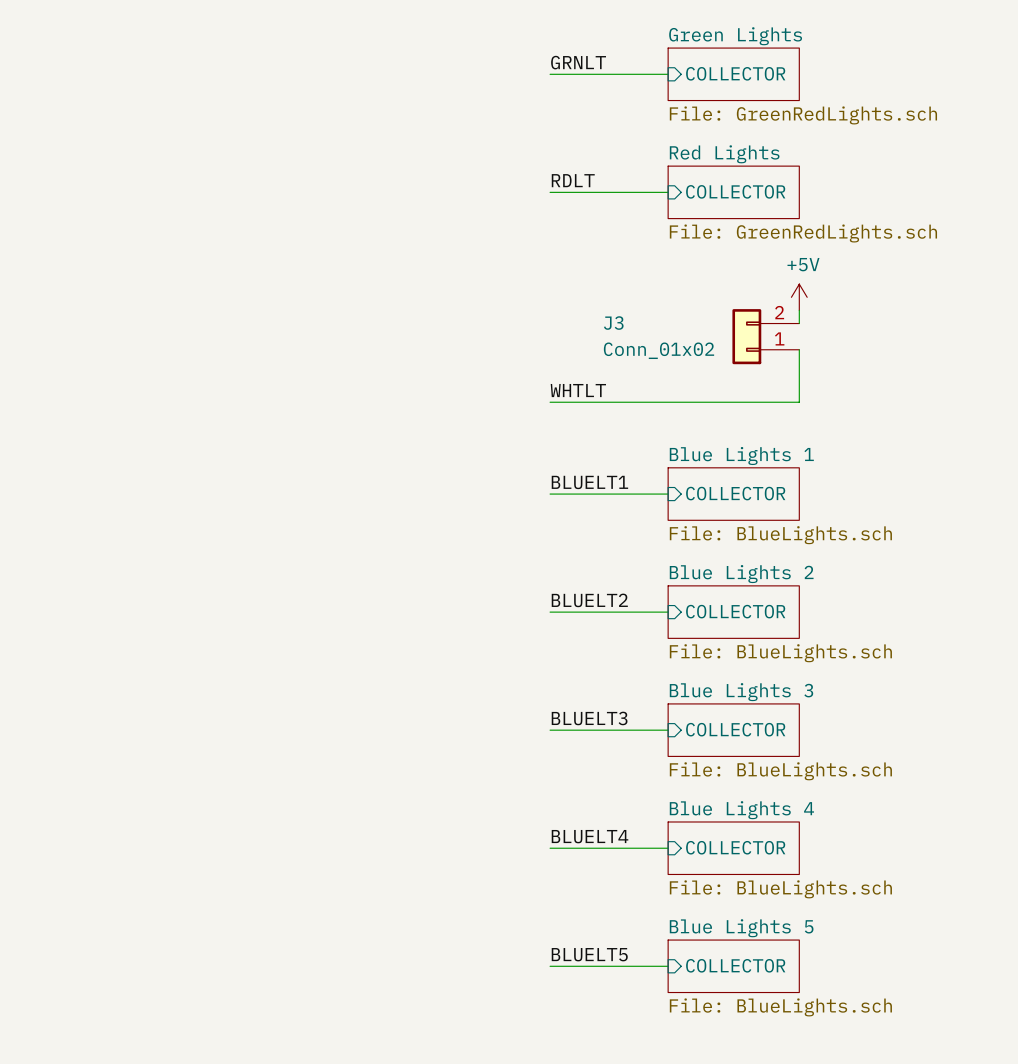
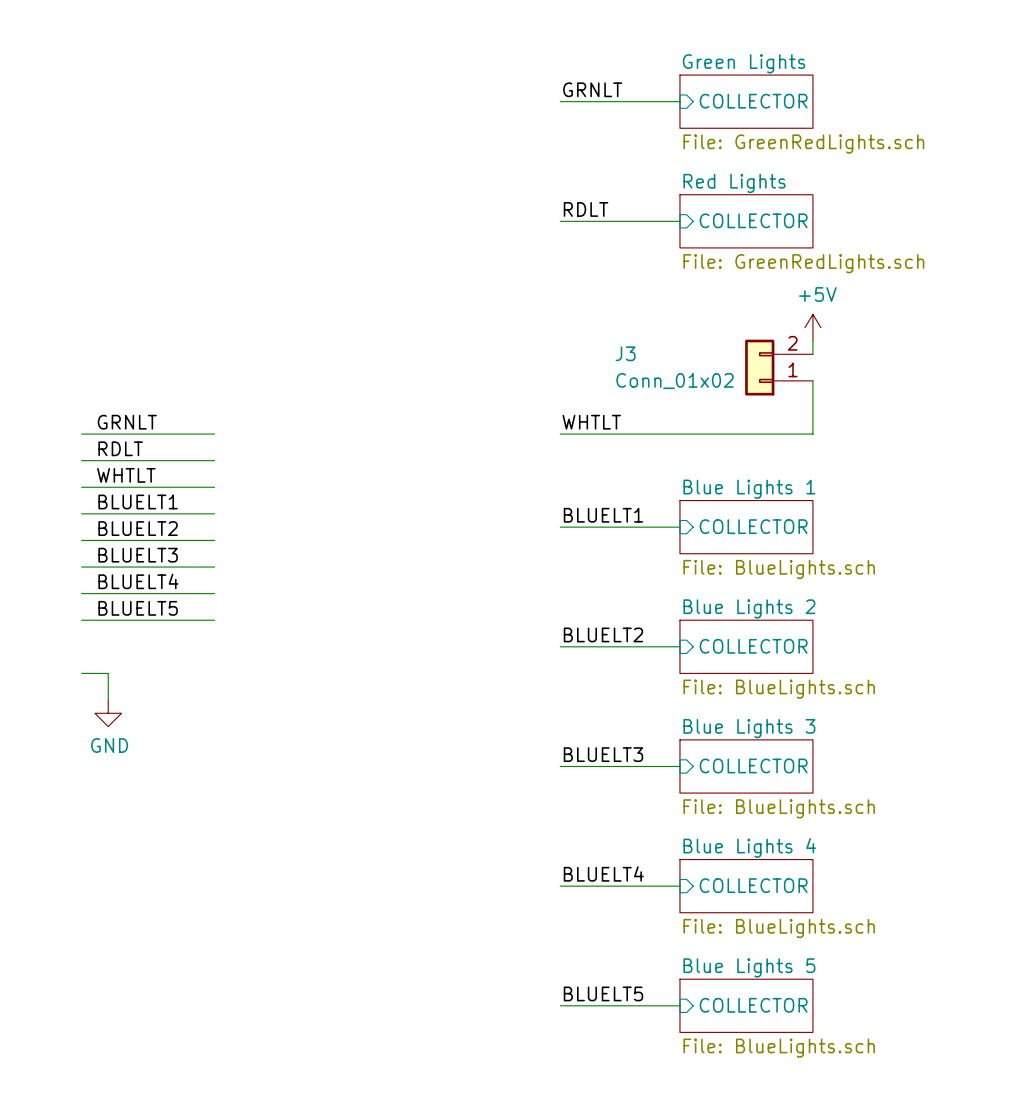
label: none -> GRNLT (127, 422)
wire: none -> (81, 434) (214, 434)
label: none -> RDLT (120, 448)
wire: none -> (81, 460) (214, 460)
label: none -> WHTLT (126, 475)
wire: none -> (81, 487) (214, 487)
label: none -> BLUELT1 (138, 501)
wire: none -> (81, 513) (214, 513)
label: none -> BLUELT2 (138, 528)
wire: none -> (81, 540) (214, 540)
label: none -> BLUELT3 (138, 555)
wire: none -> (81, 567) (214, 567)
label: none -> BLUELT4 (138, 581)
wire: none -> (81, 593) (214, 593)
label: none -> BLUELT5 (138, 608)
wire: none -> (81, 620) (214, 620)
wire: none -> (81, 673) (108, 673) (108, 699)
power symbol: none -> GND (108, 713)

